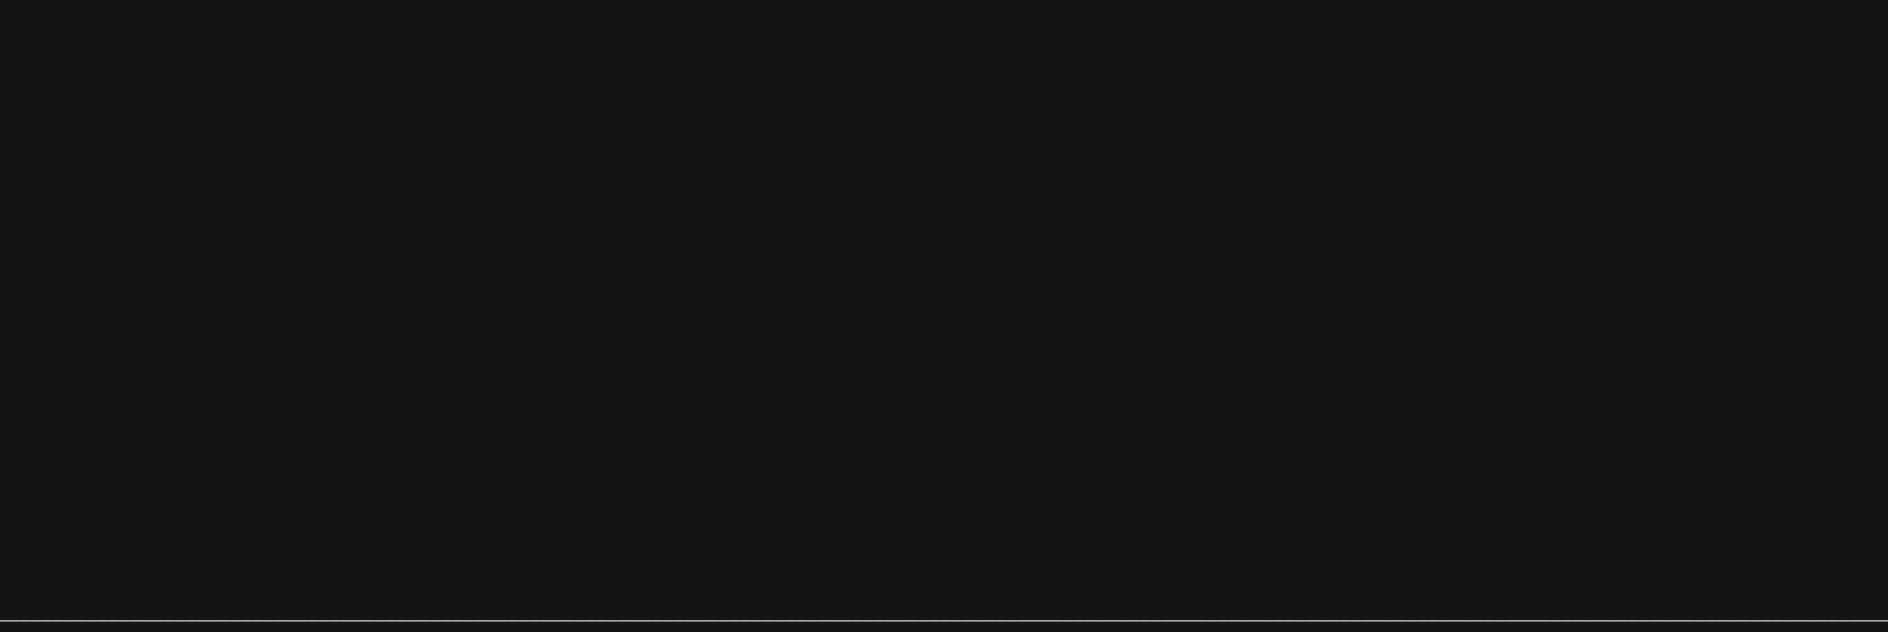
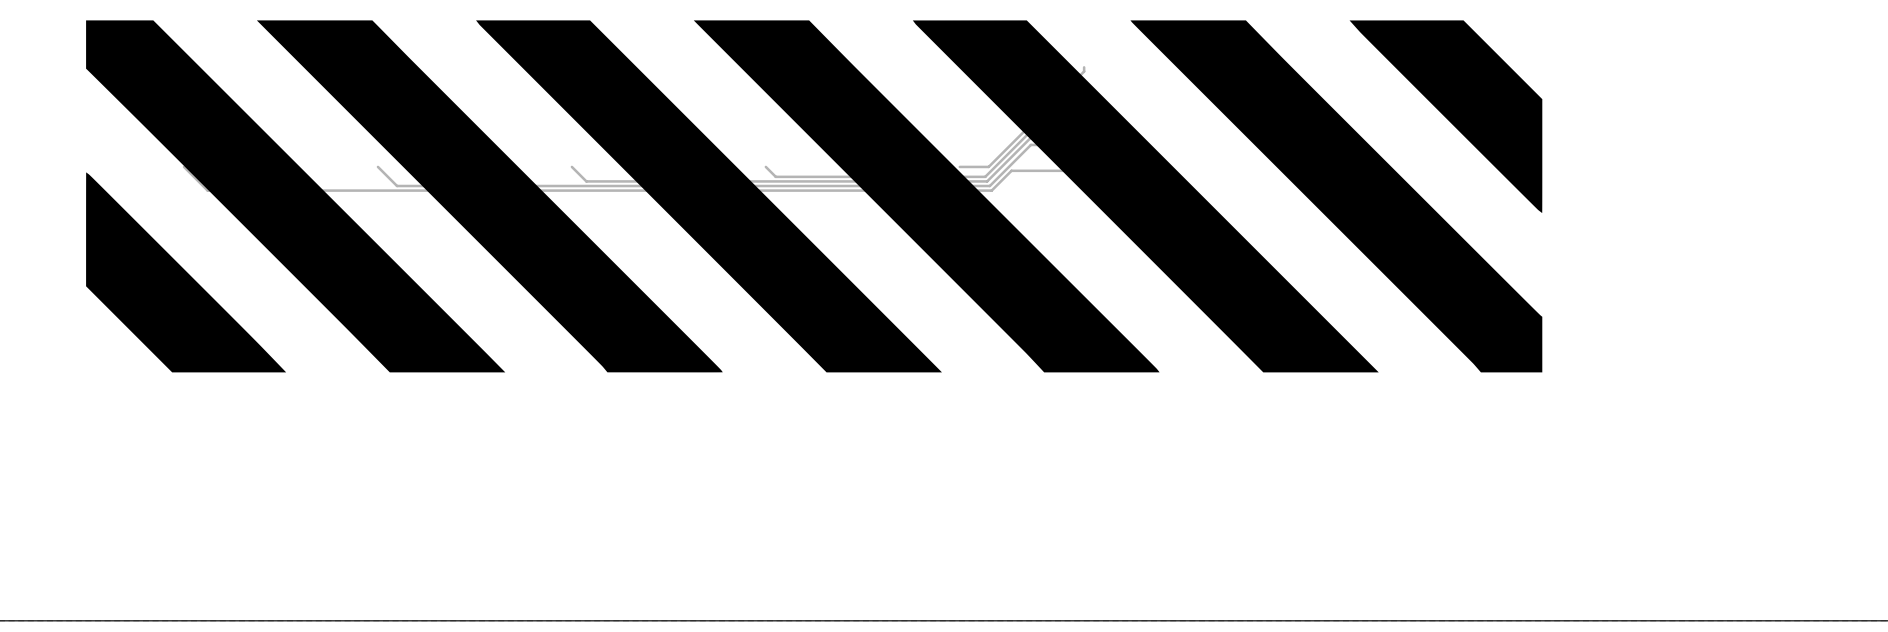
drawing: none -> [86, 20, 1543, 373]
track: none -> (1084, 67) (1084, 71) (988, 166) (959, 166)
track: none -> (1084, 93) (1068, 93) (985, 176) (775, 176) (765, 166)
track: none -> (1084, 119) (1049, 119) (987, 181) (586, 181) (571, 166)
track: none -> (1084, 144) (1030, 144) (989, 186) (397, 186) (377, 166)
track: none -> (184, 166) (207, 190) (991, 190) (1011, 170) (1084, 170)

